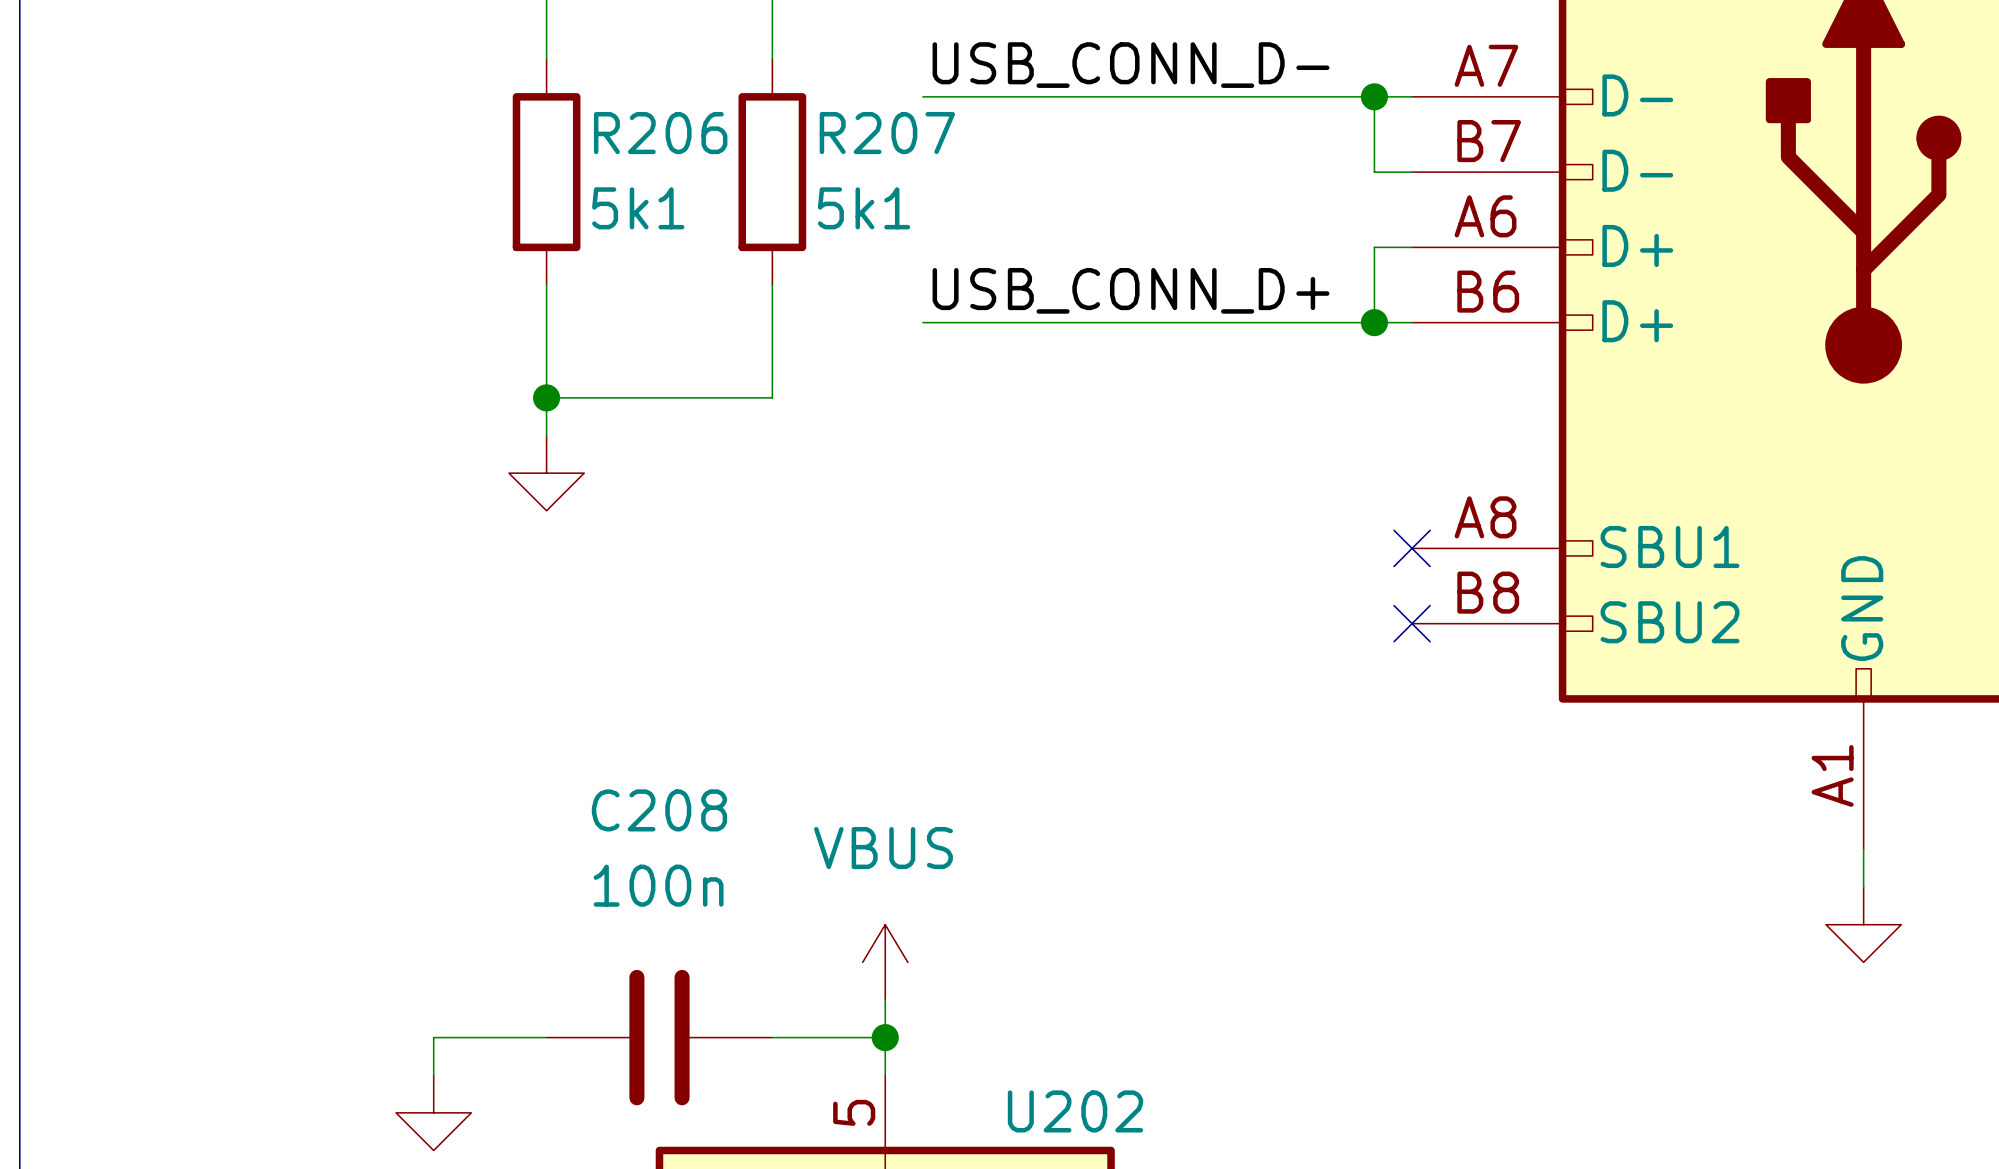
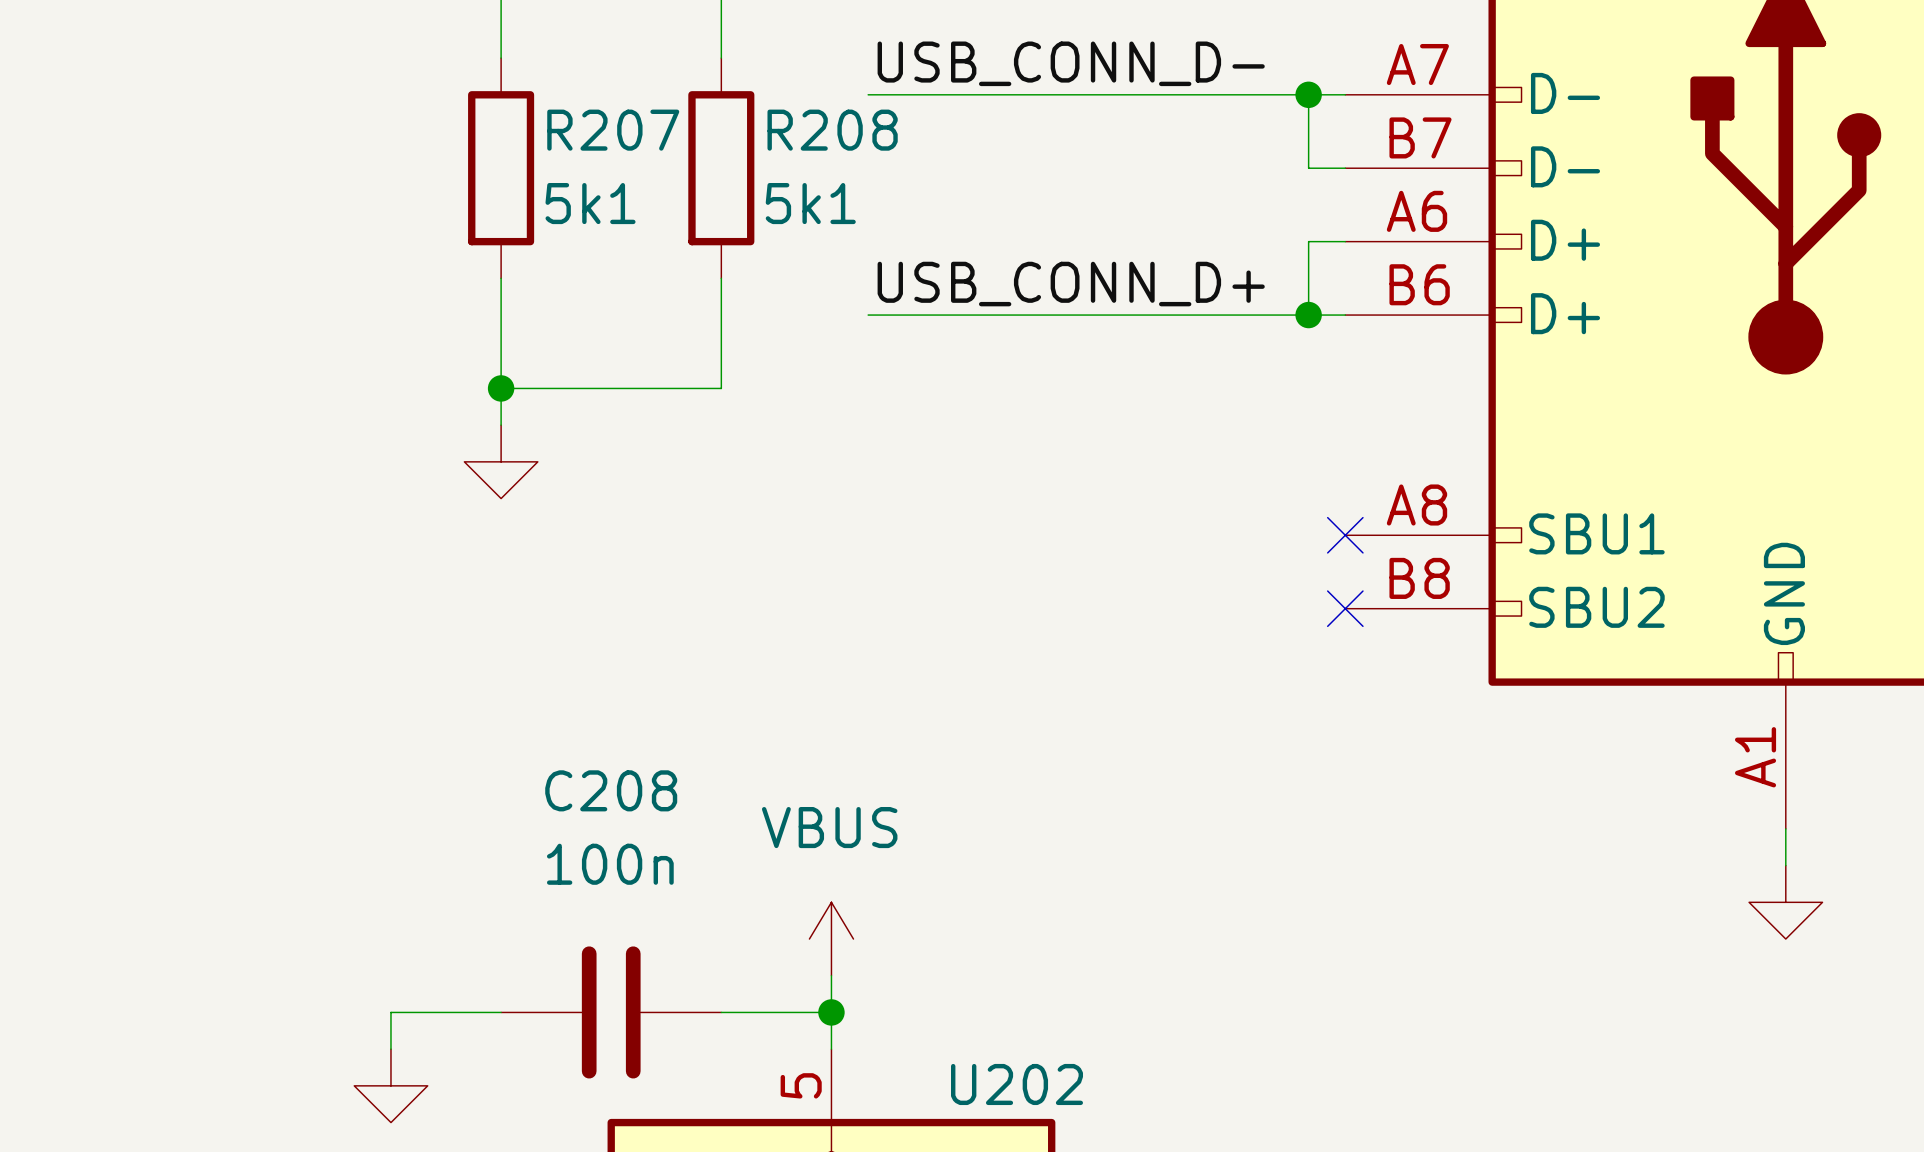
R206 name: R206 (660, 133) -> R207 (613, 130)
R207 name: R207 (887, 133) -> R208 (832, 130)

